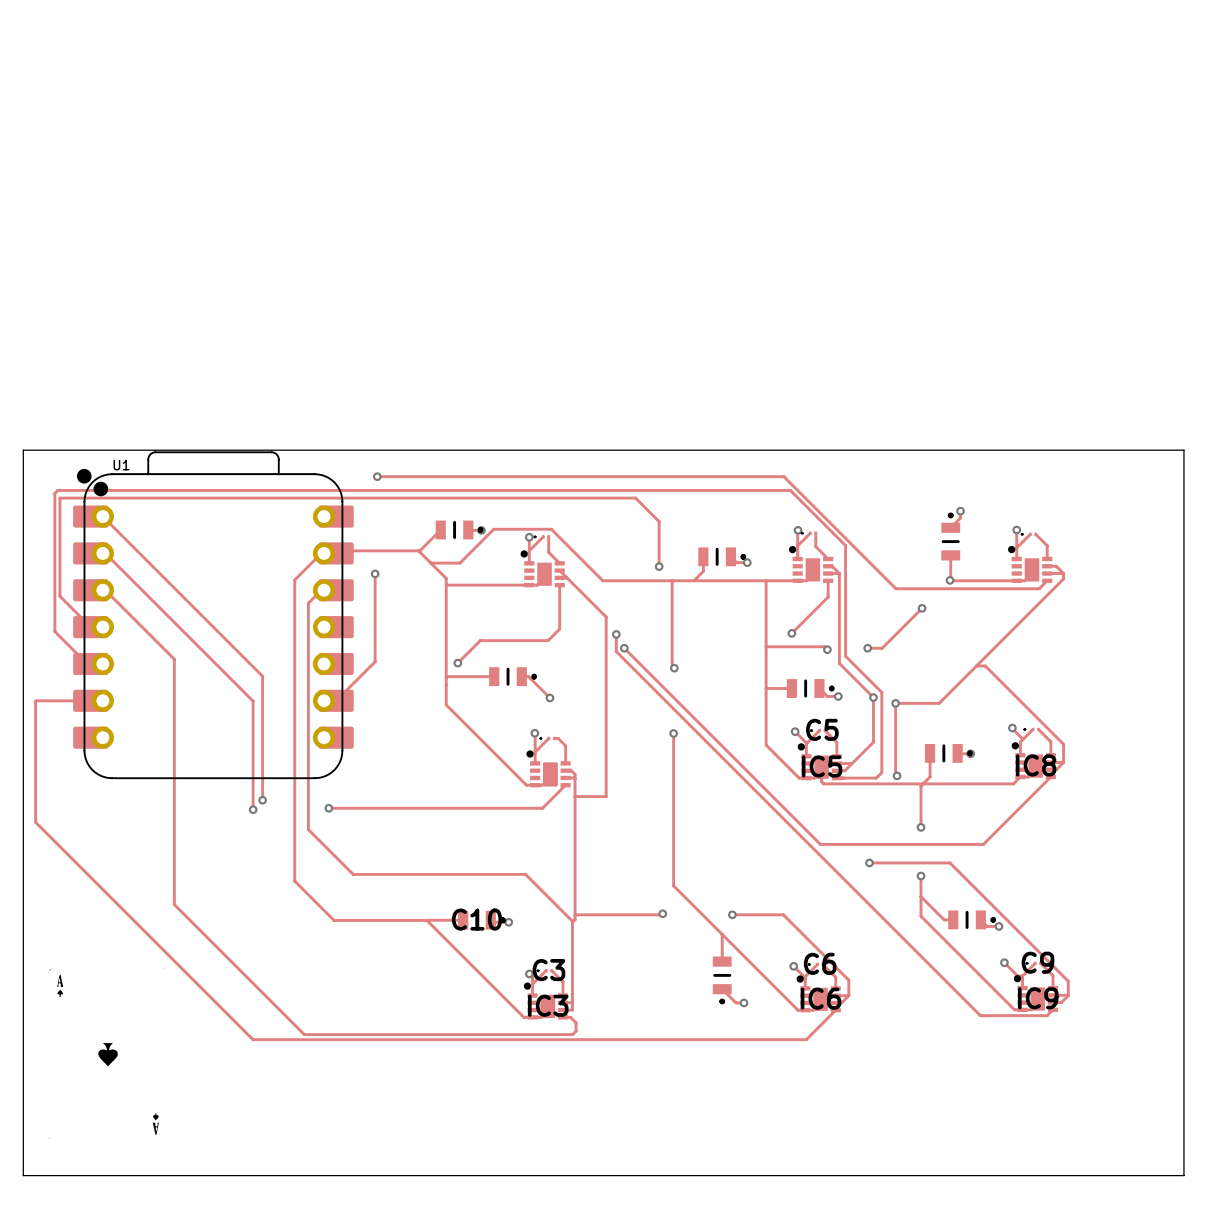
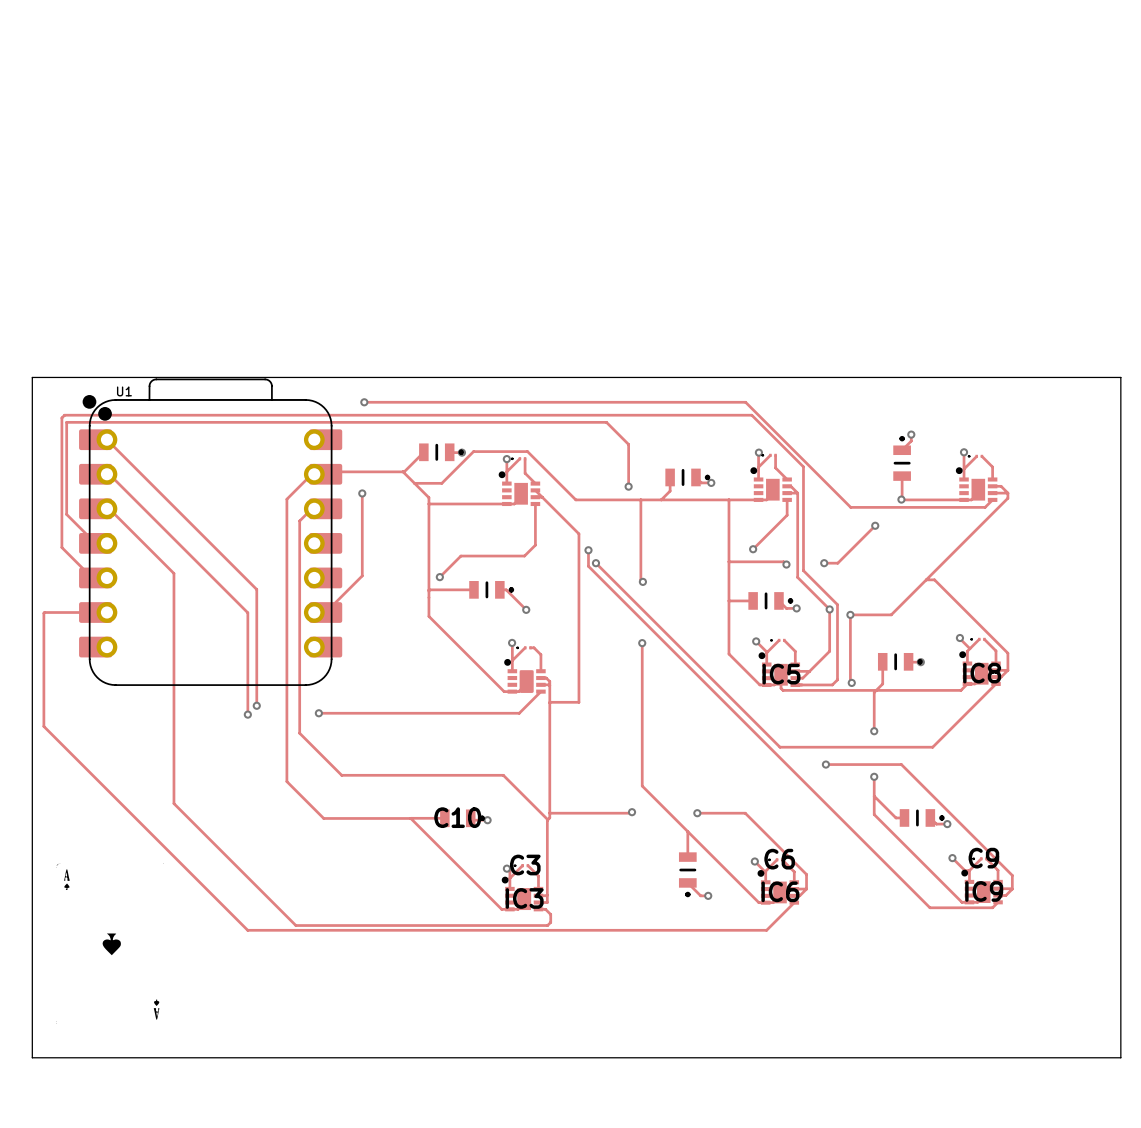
C5 name: C5 (822, 729) -> none

